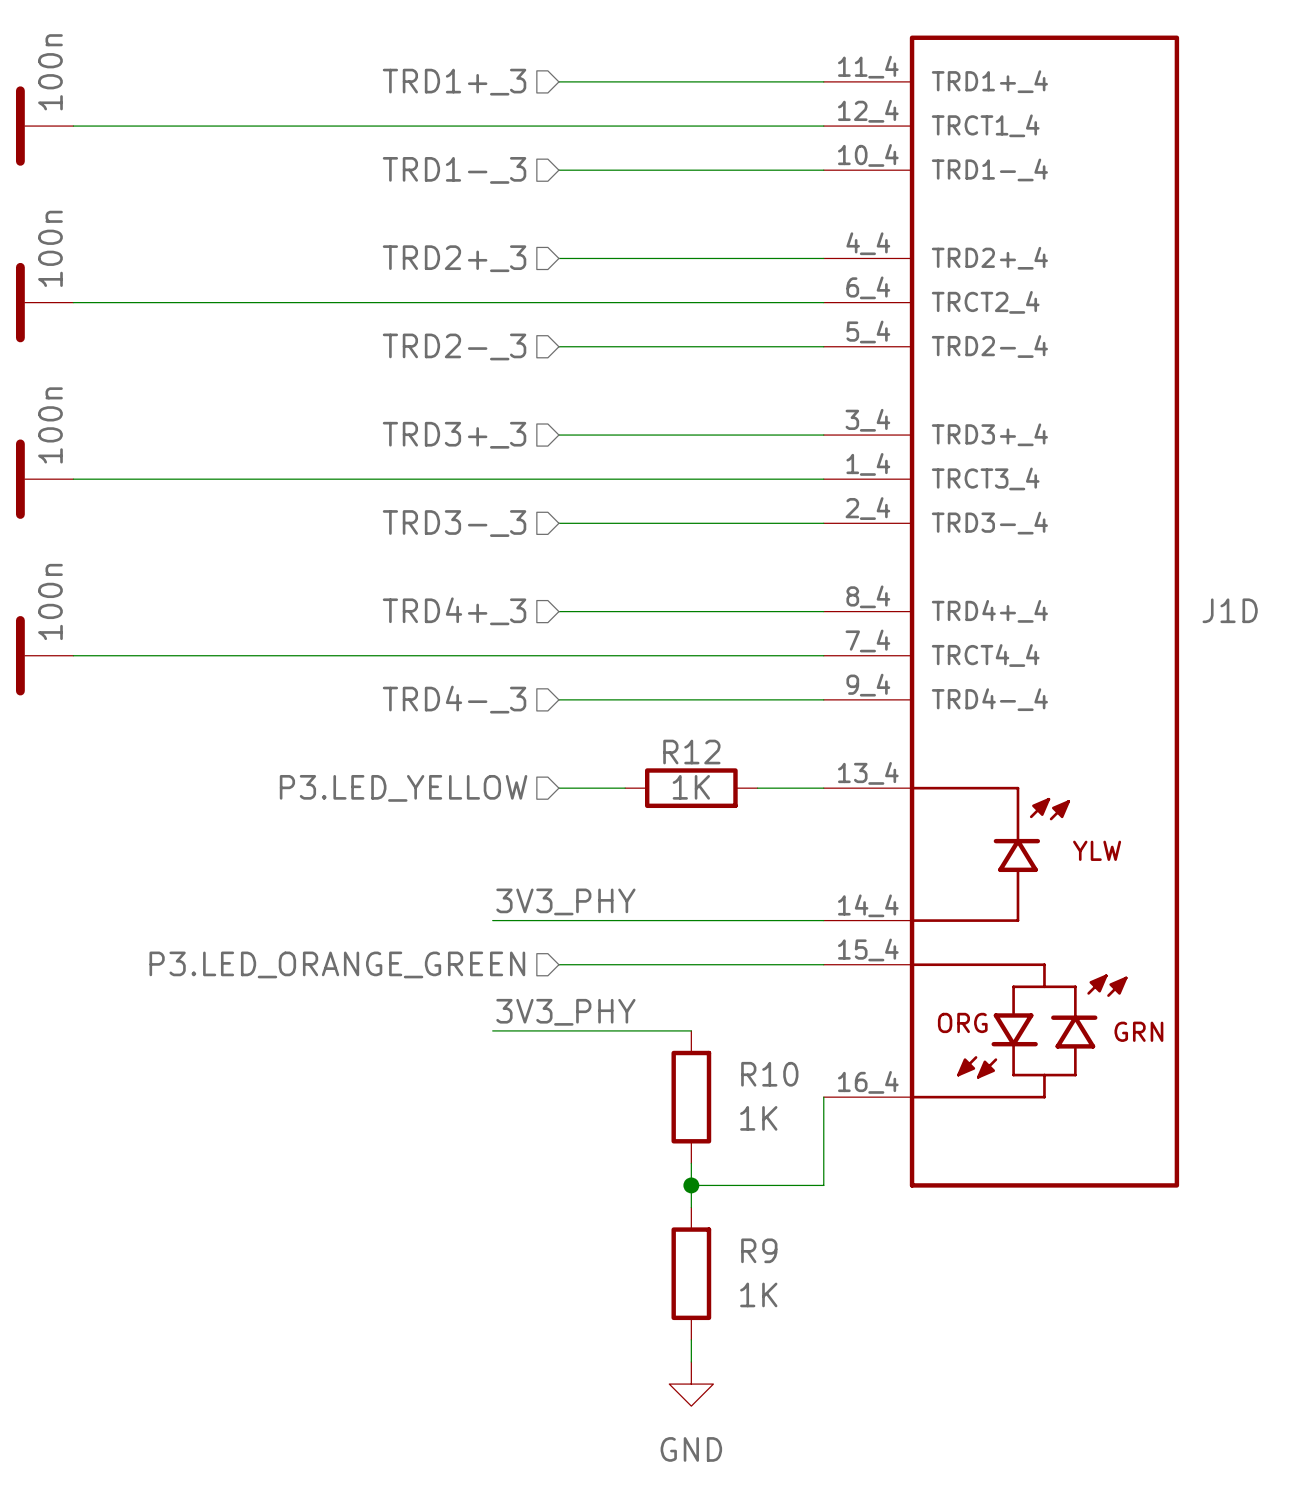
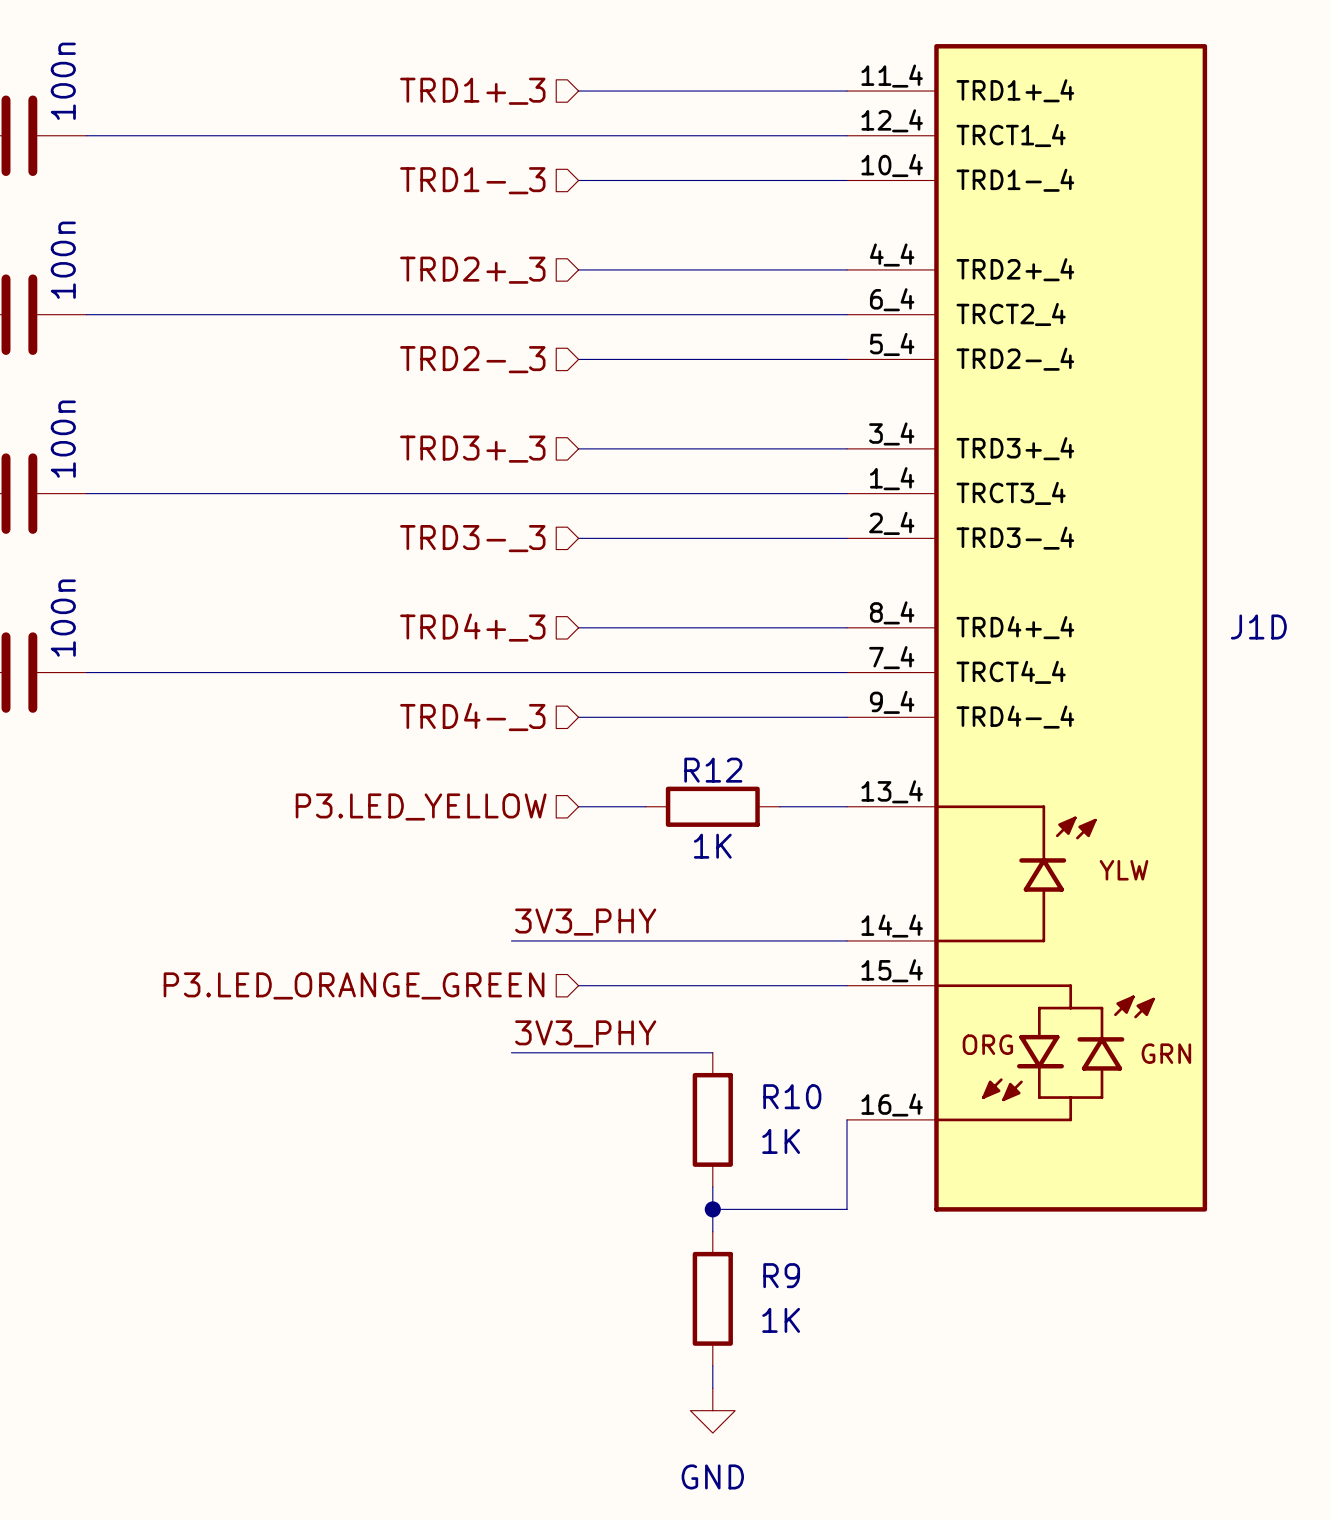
R12 value position: 1K (691, 787) -> 1K (712, 846)

